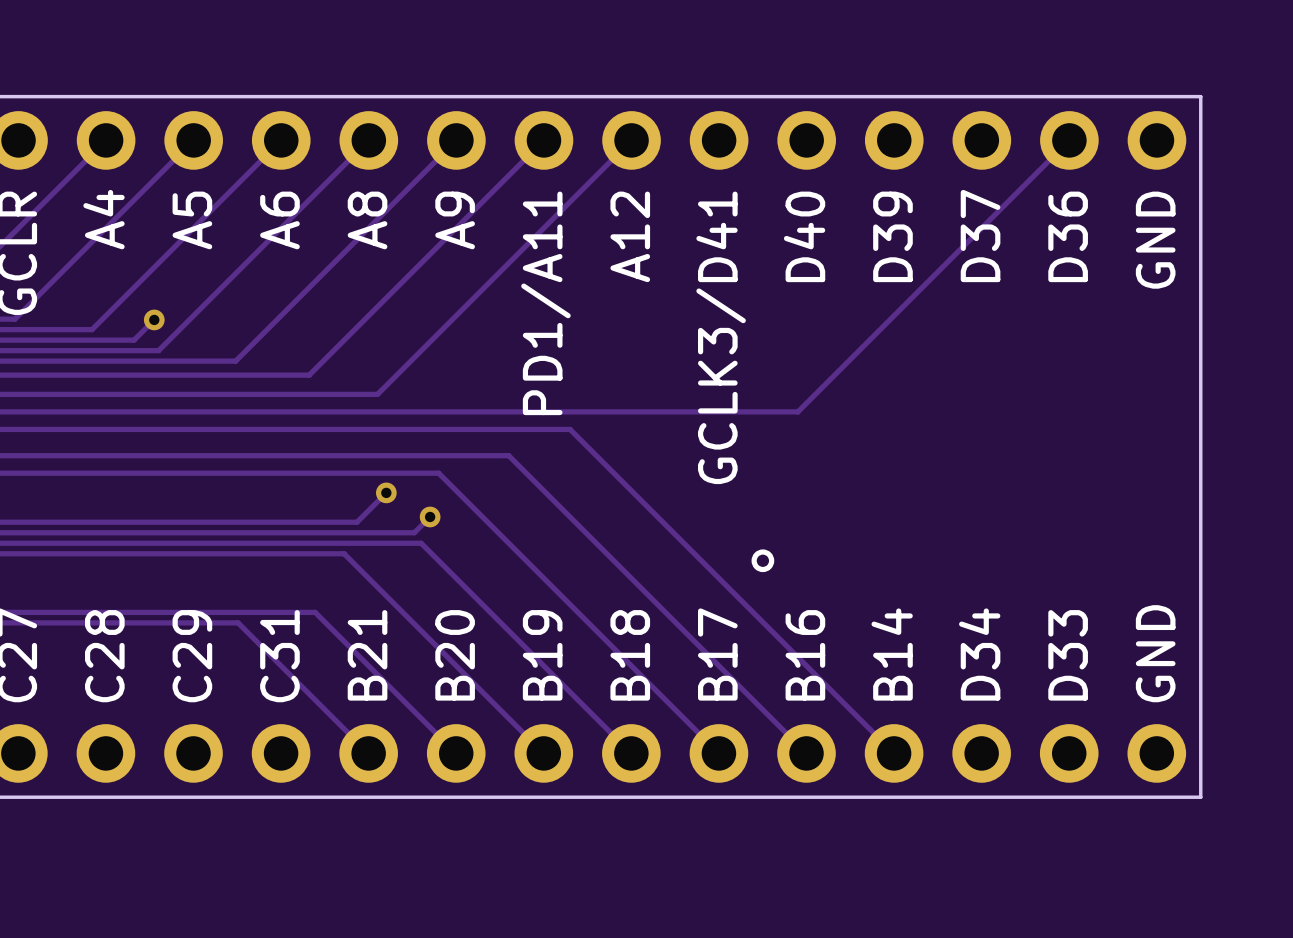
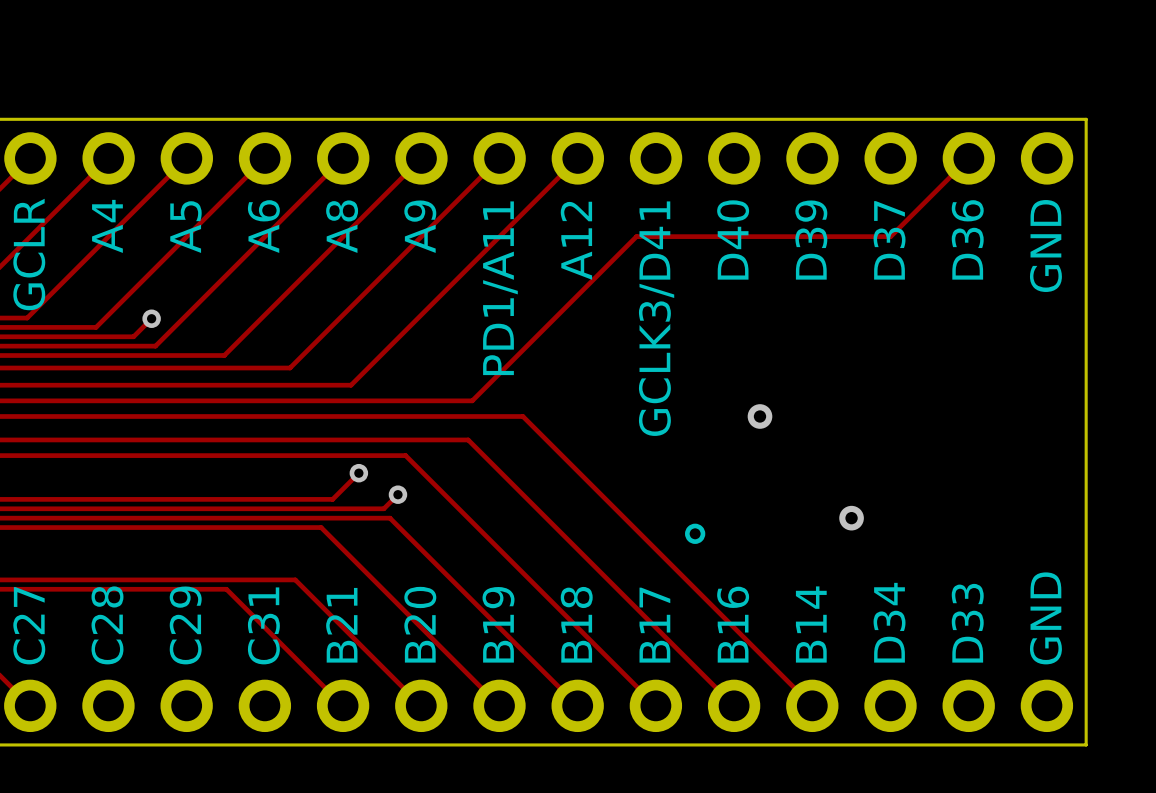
track: (981, 228) (797, 411) (513, 411) -> (890, 236) (636, 236) (472, 400)
via: none -> (759, 416)
via: none -> (851, 518)

